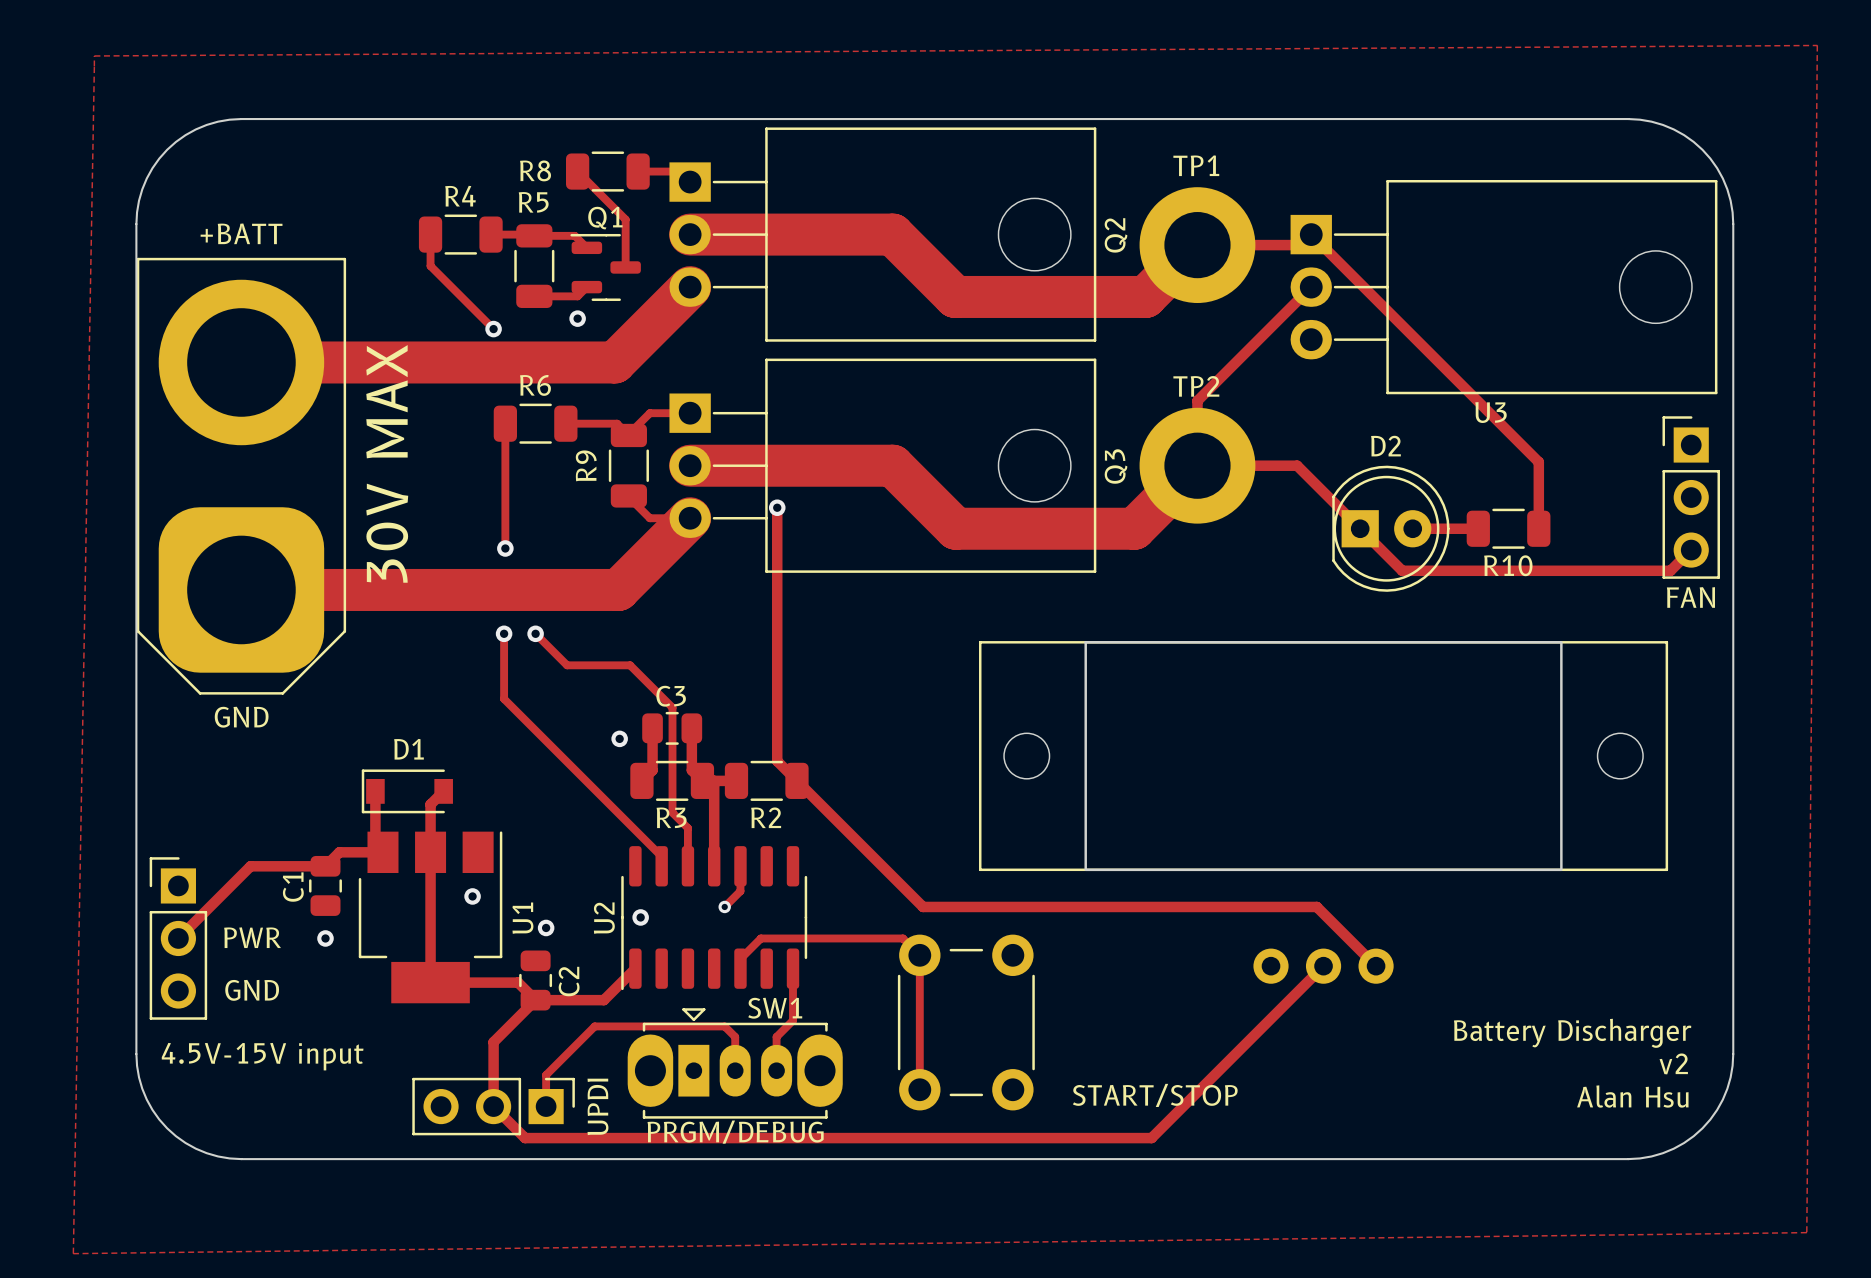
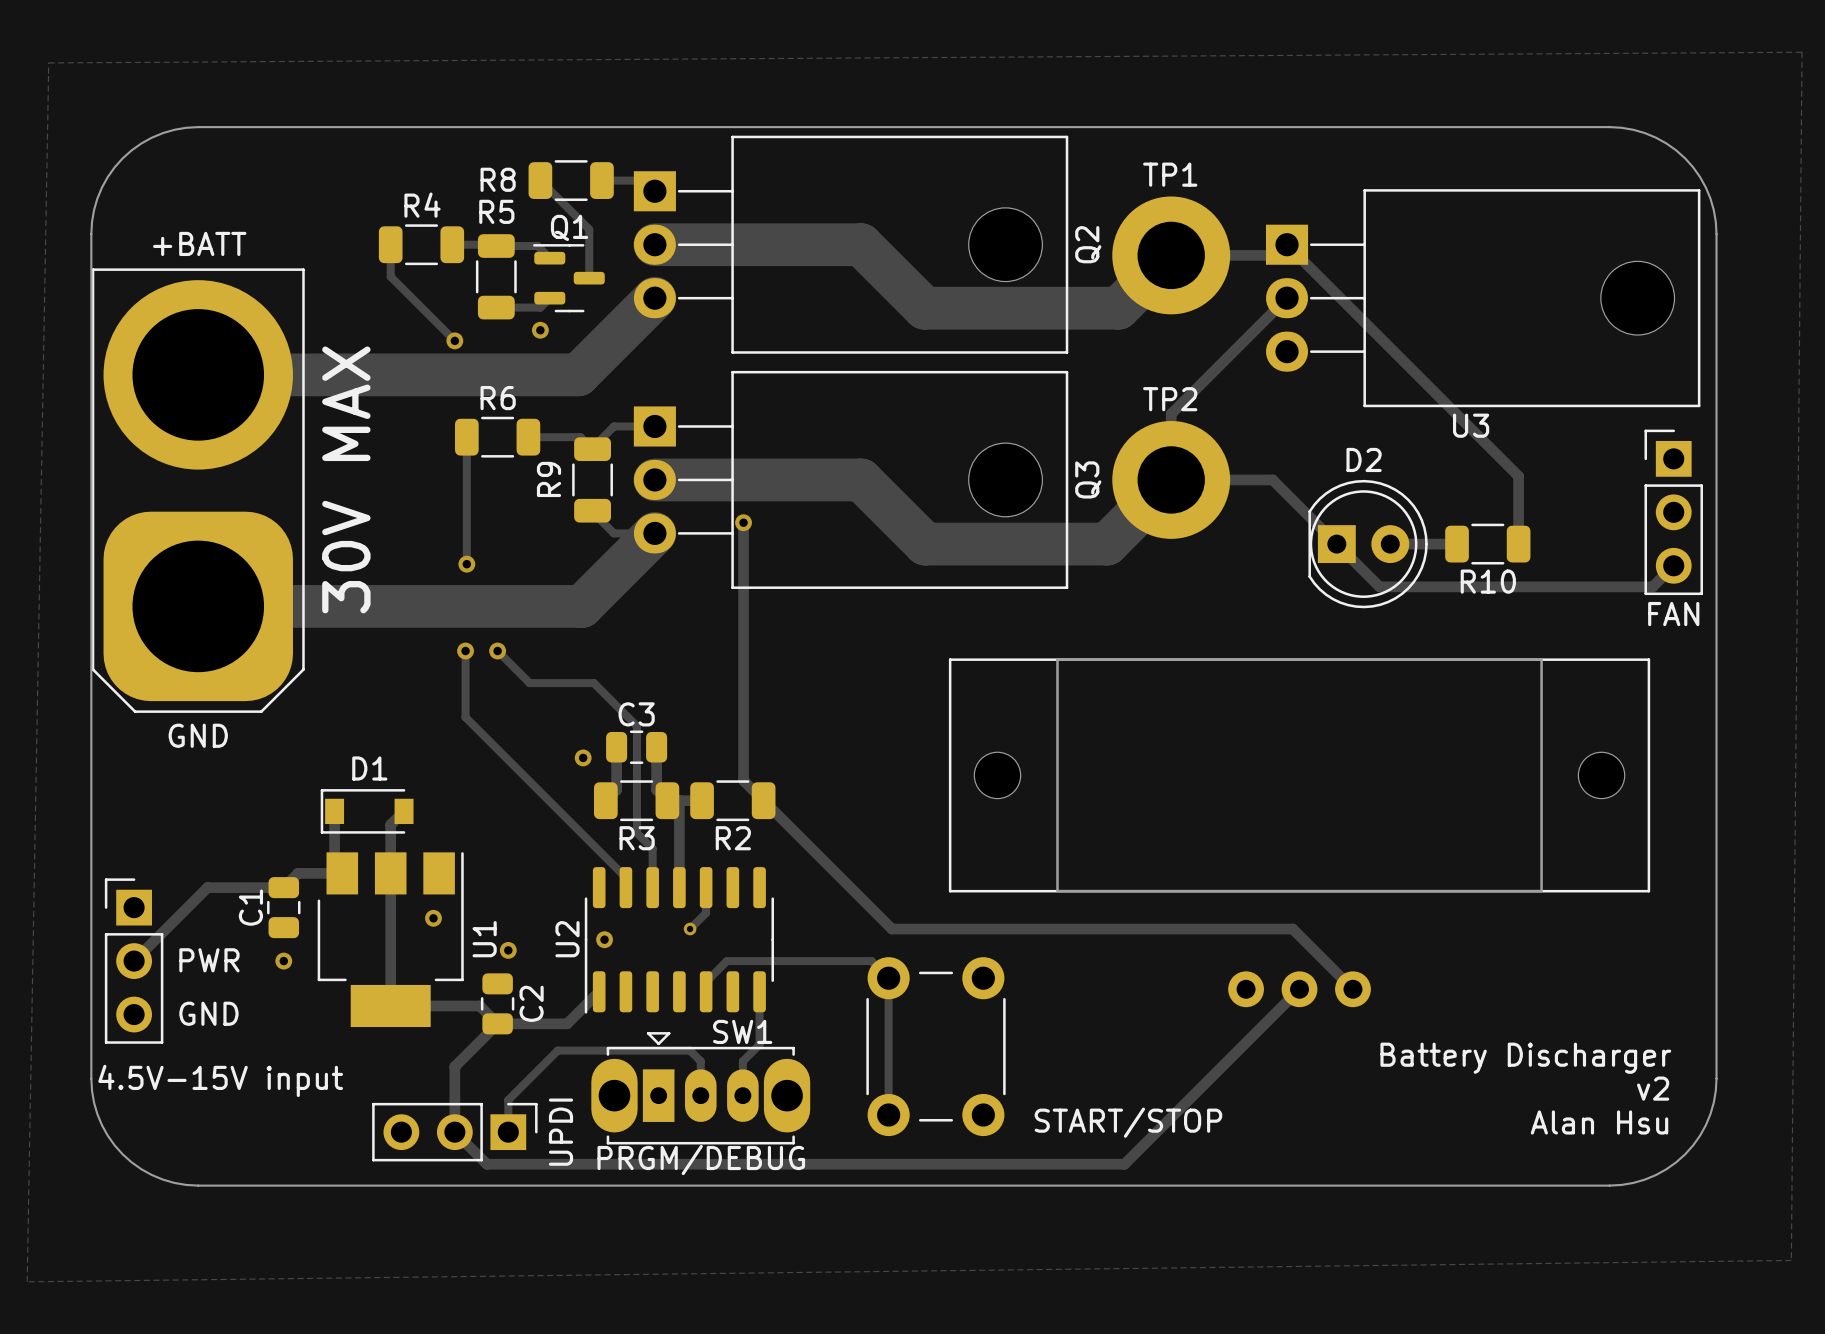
part footprint: [136, 257, 347, 695] -> [91, 268, 305, 713]

